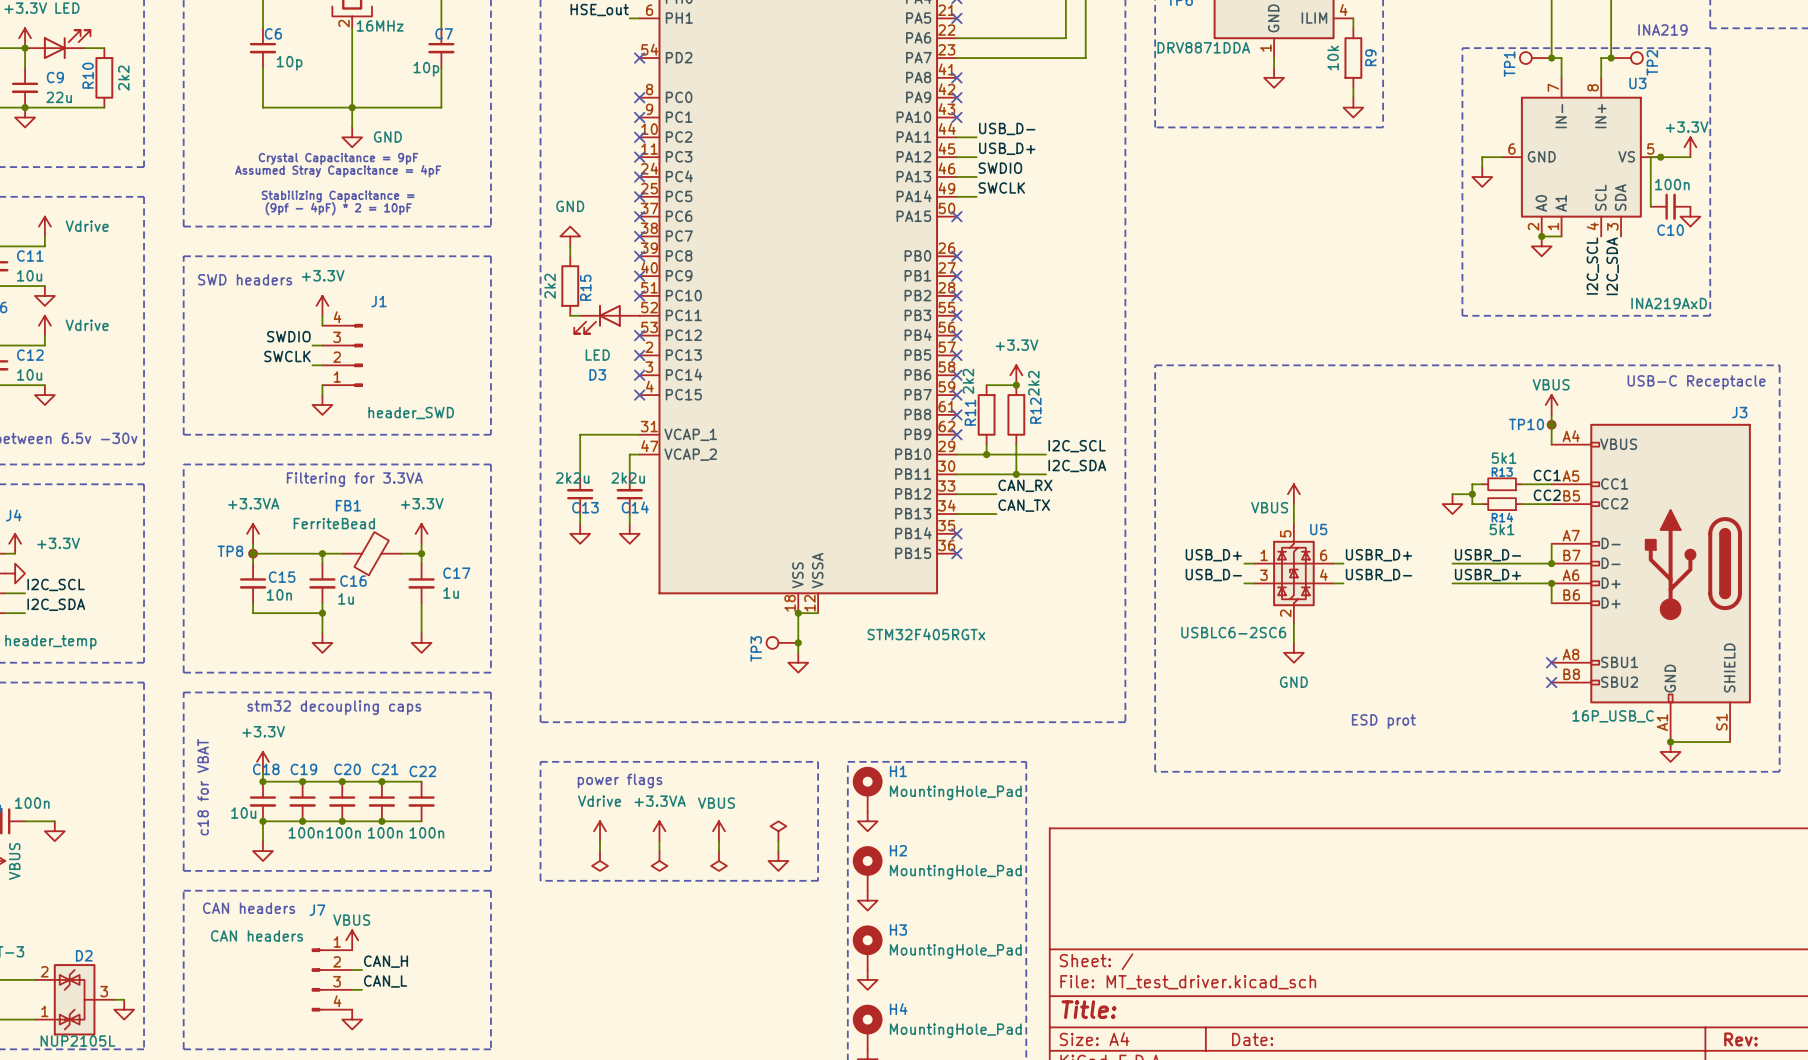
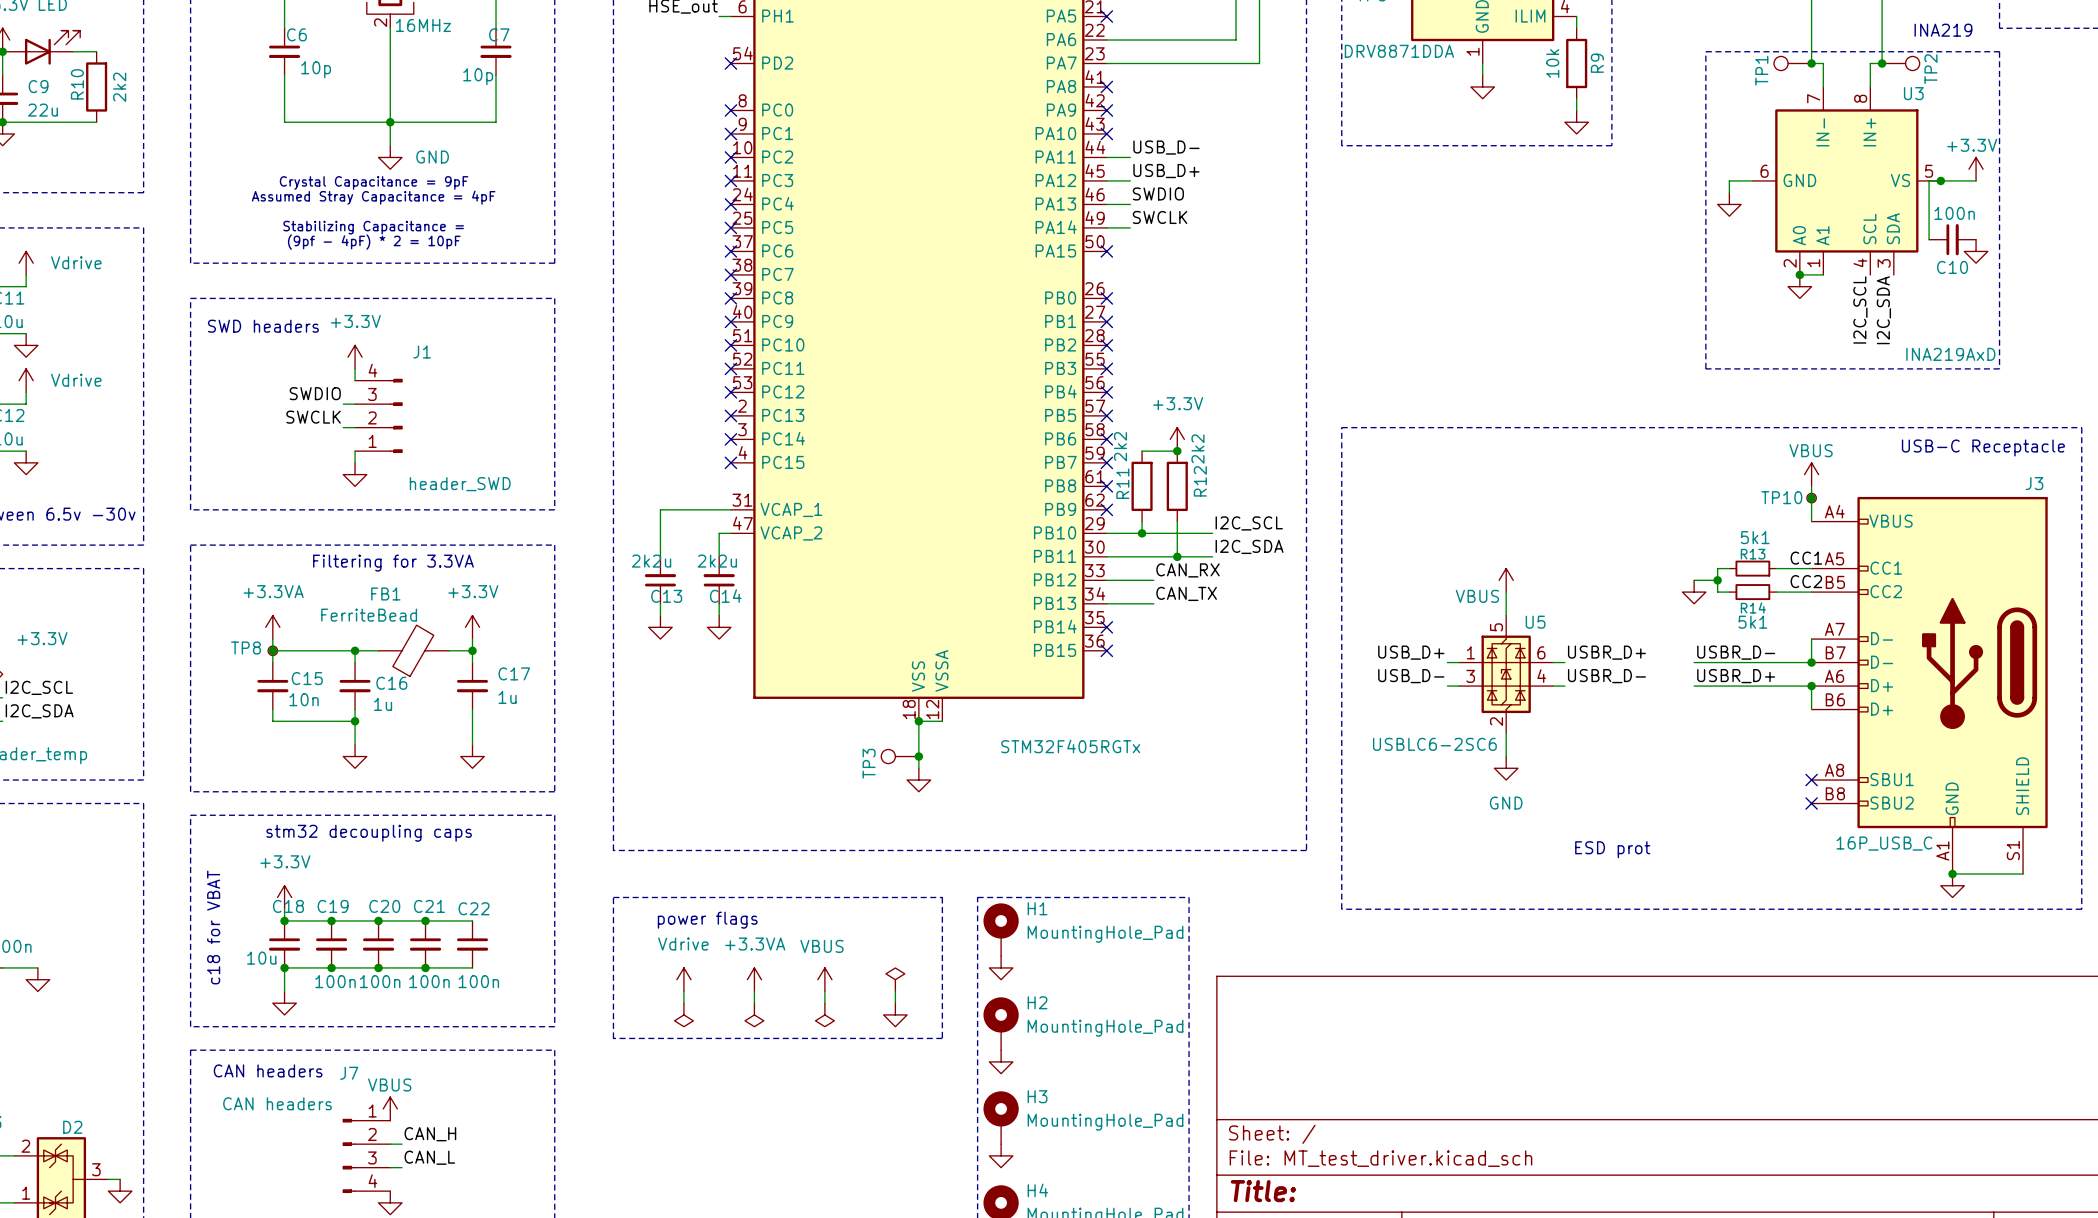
power symbol: GND (570, 236) -> none
wire: (570, 246) (570, 256) -> none
R15: 2k2 (570, 286) -> none
wire: (570, 315) (580, 315) -> none
no-connect mark: none -> (730, 368)
D3: LED (606, 319) -> none

